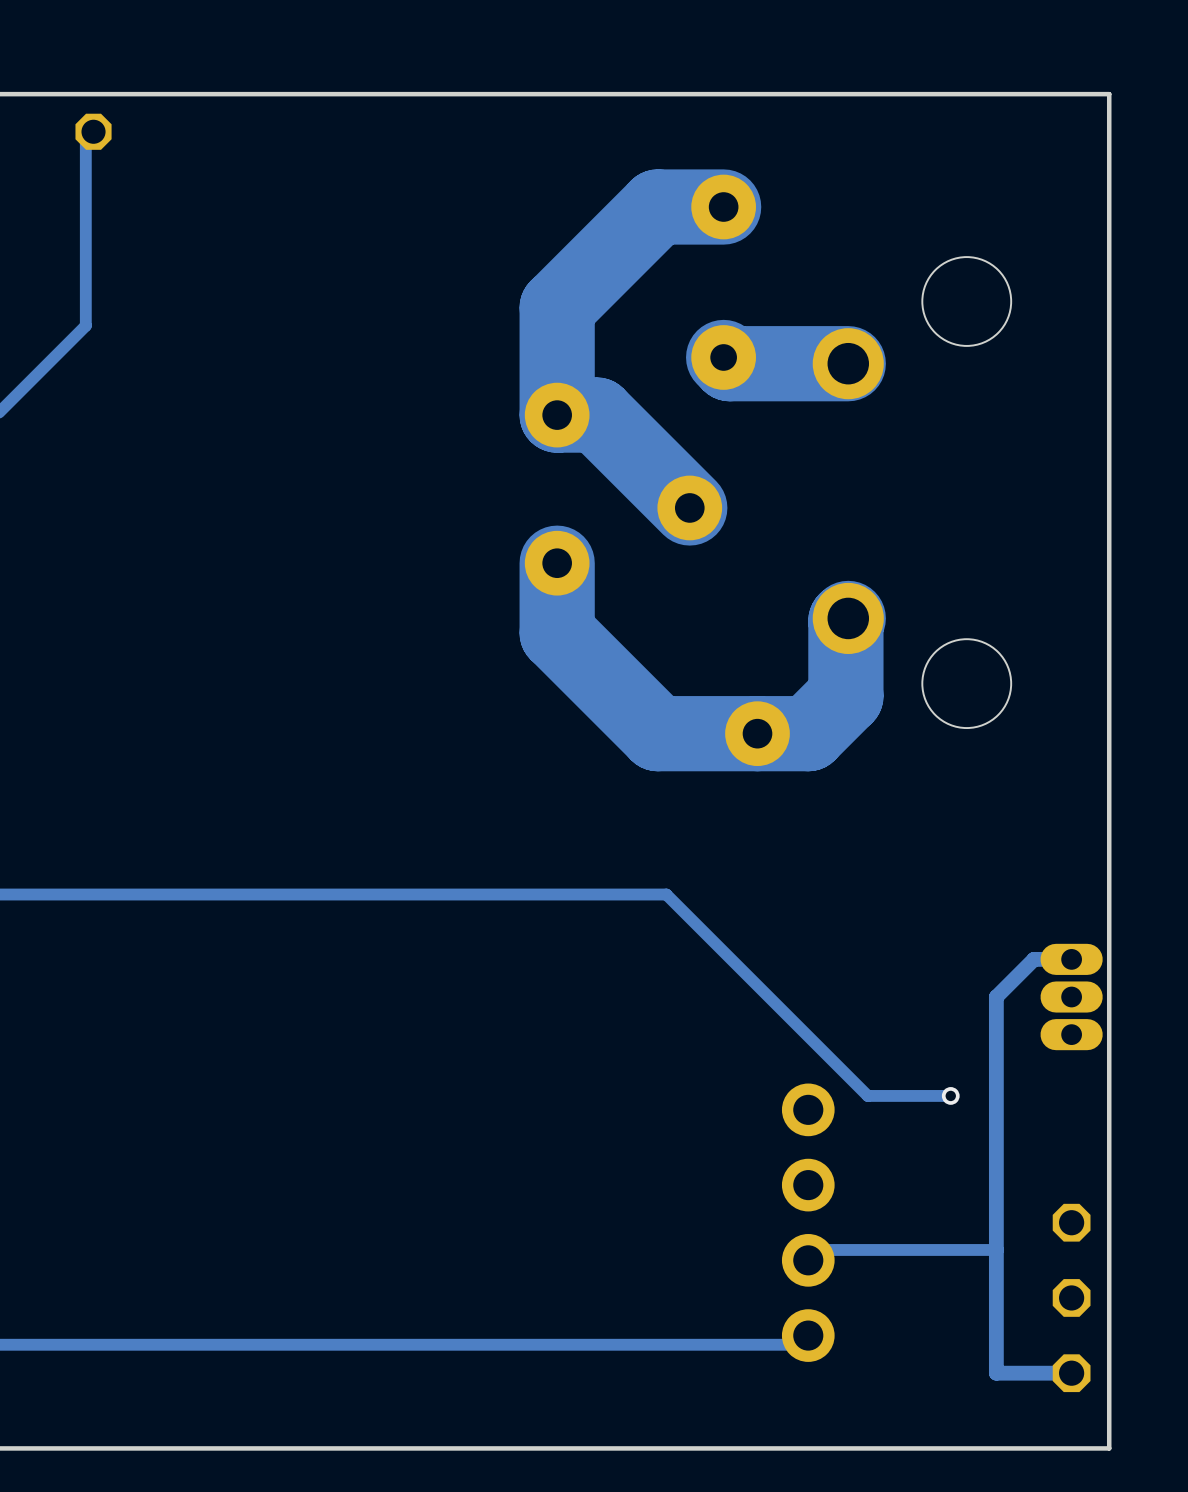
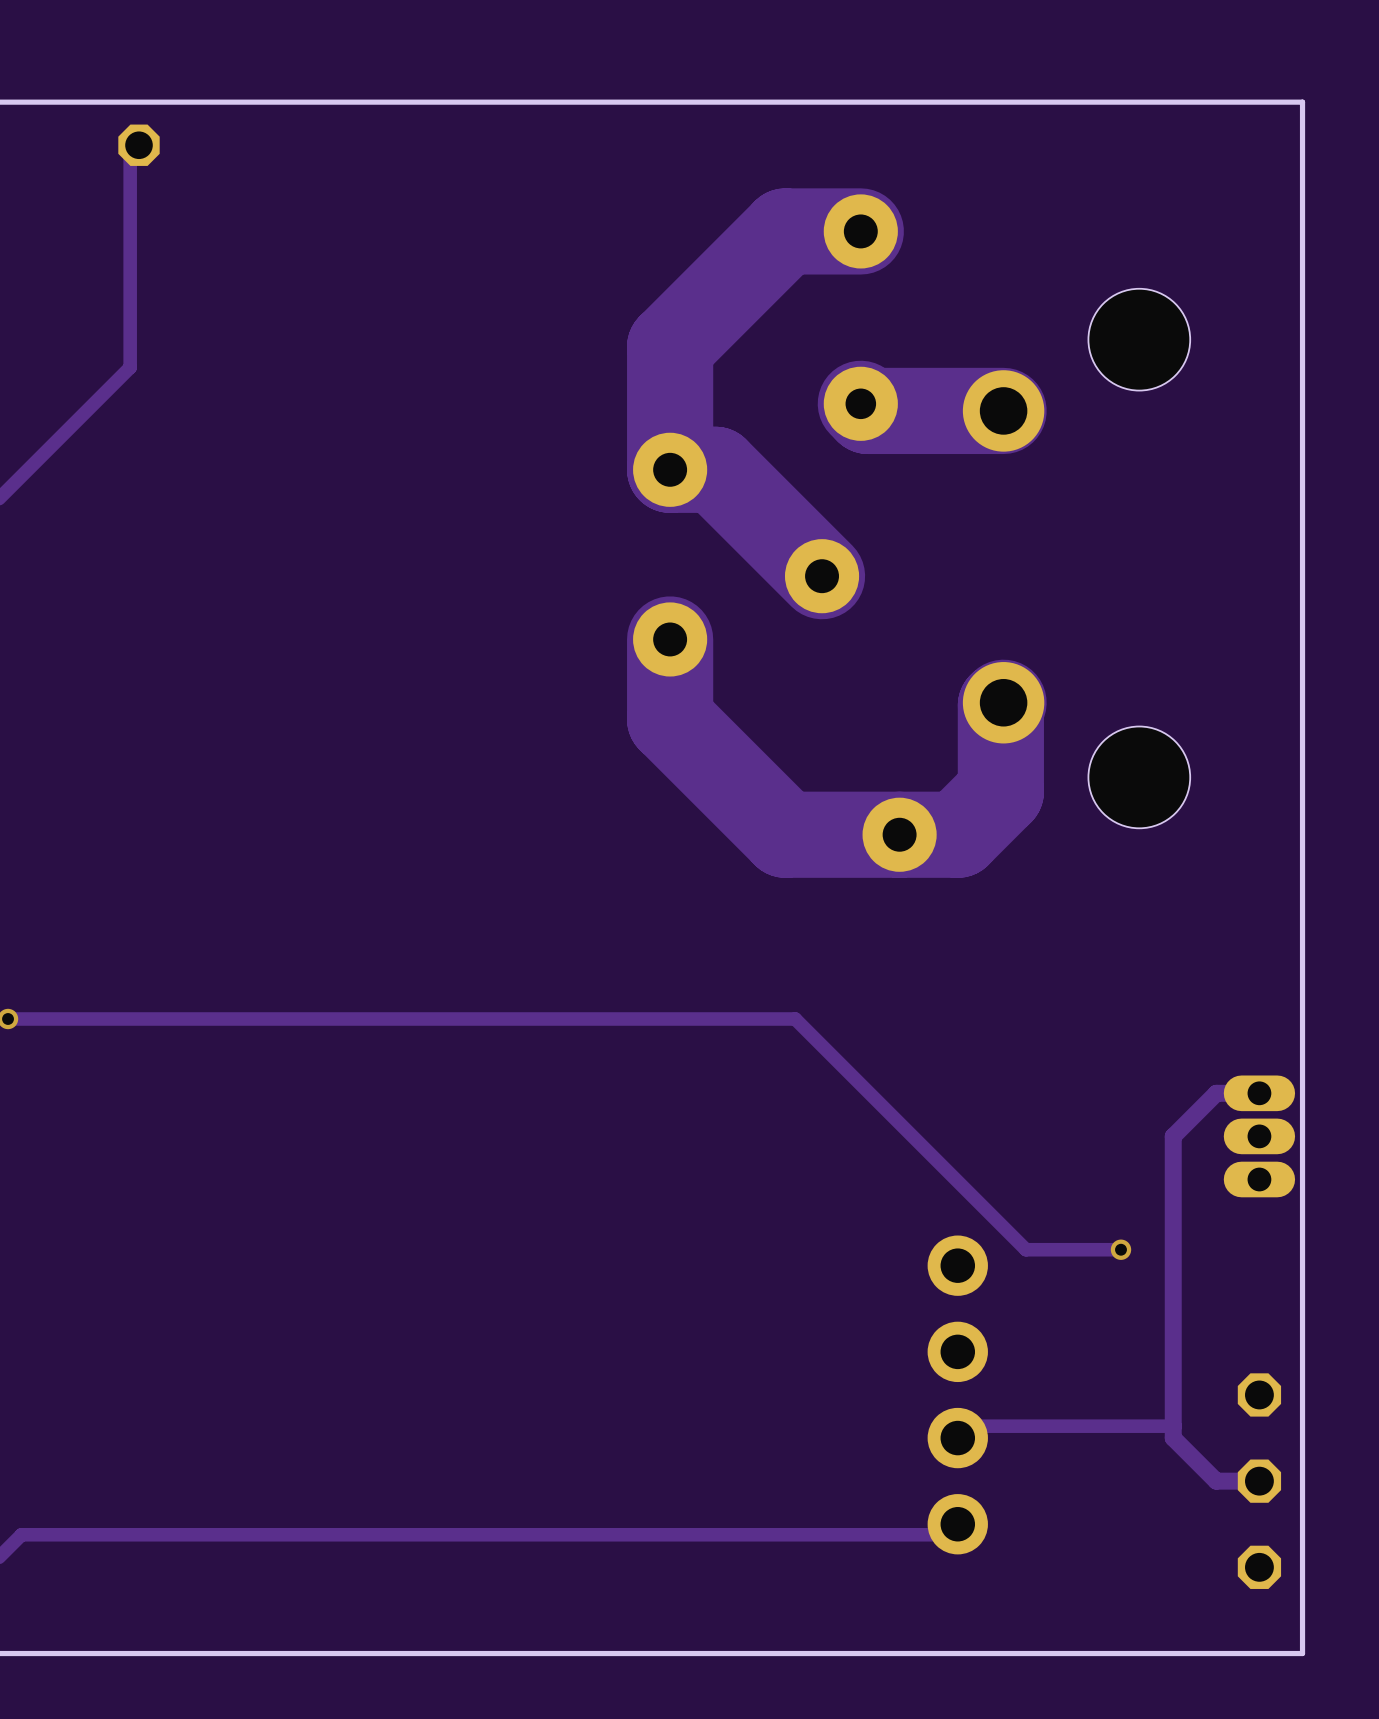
track: (996, 1260) (996, 1373) (1071, 1373) -> (1173, 1438) (1216, 1481) (1259, 1481)

